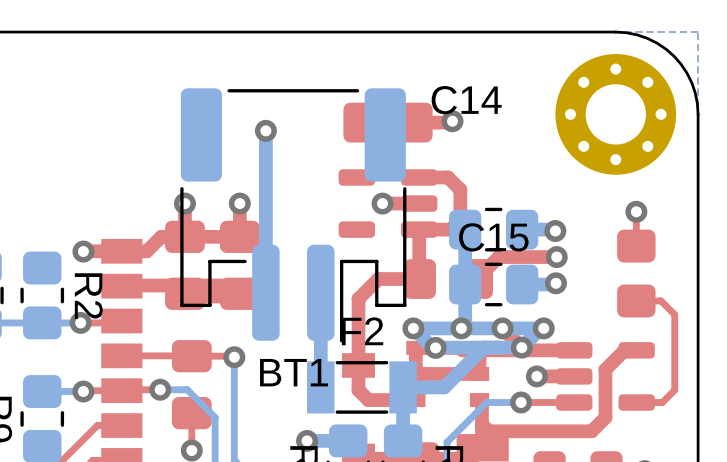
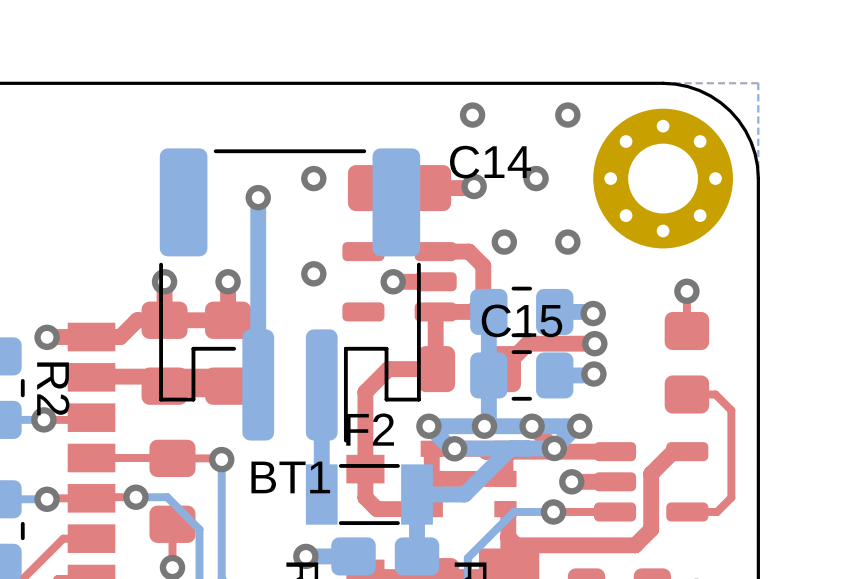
via: none -> (472, 115)
via: none -> (567, 115)
via: none -> (313, 178)
via: none -> (536, 178)
via: none -> (504, 242)
via: none -> (567, 242)
via: none -> (313, 273)

